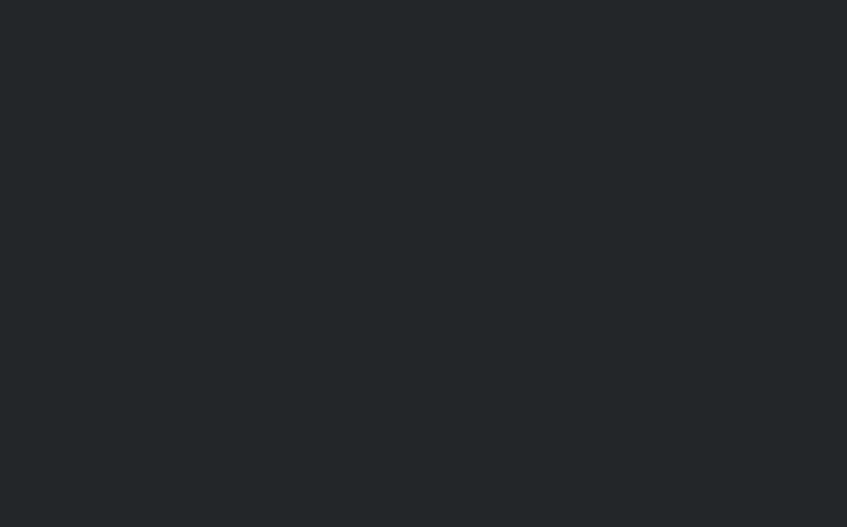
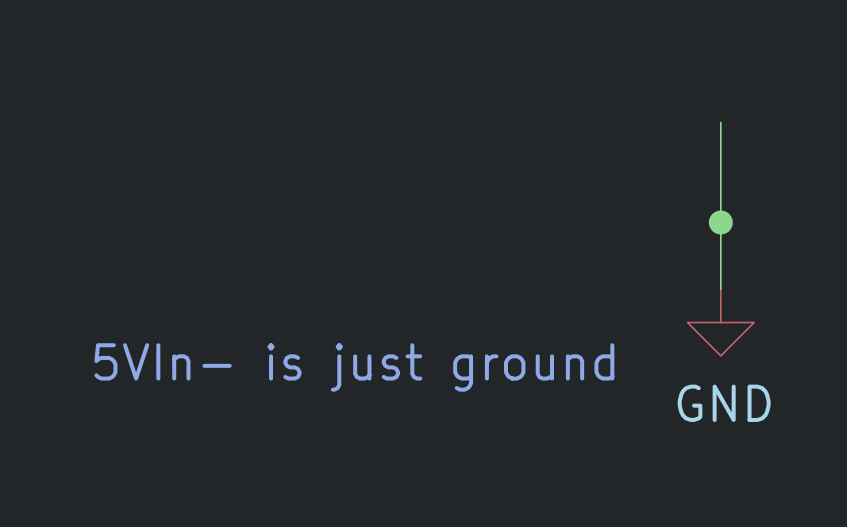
wire: none -> (720, 122) (720, 289)
junction: none -> (720, 222)
power symbol: none -> GND (720, 322)
text: none -> 5VIn- is just ground (354, 367)

